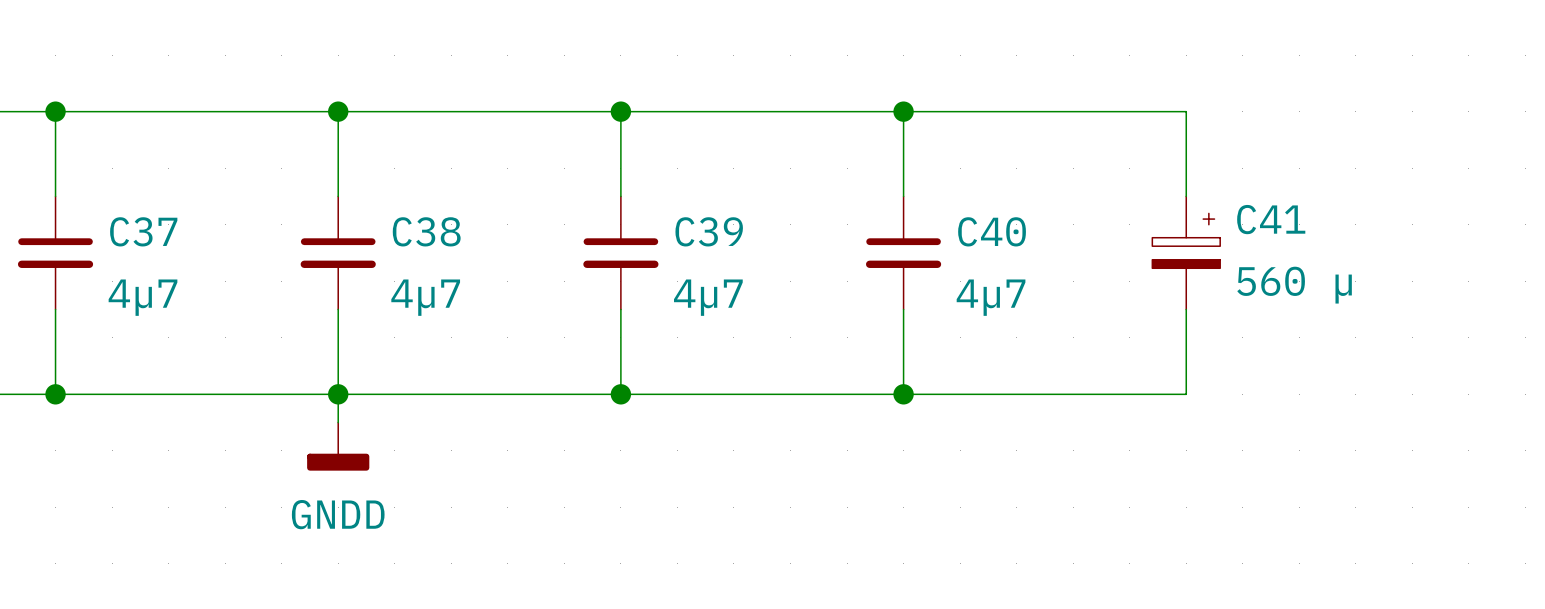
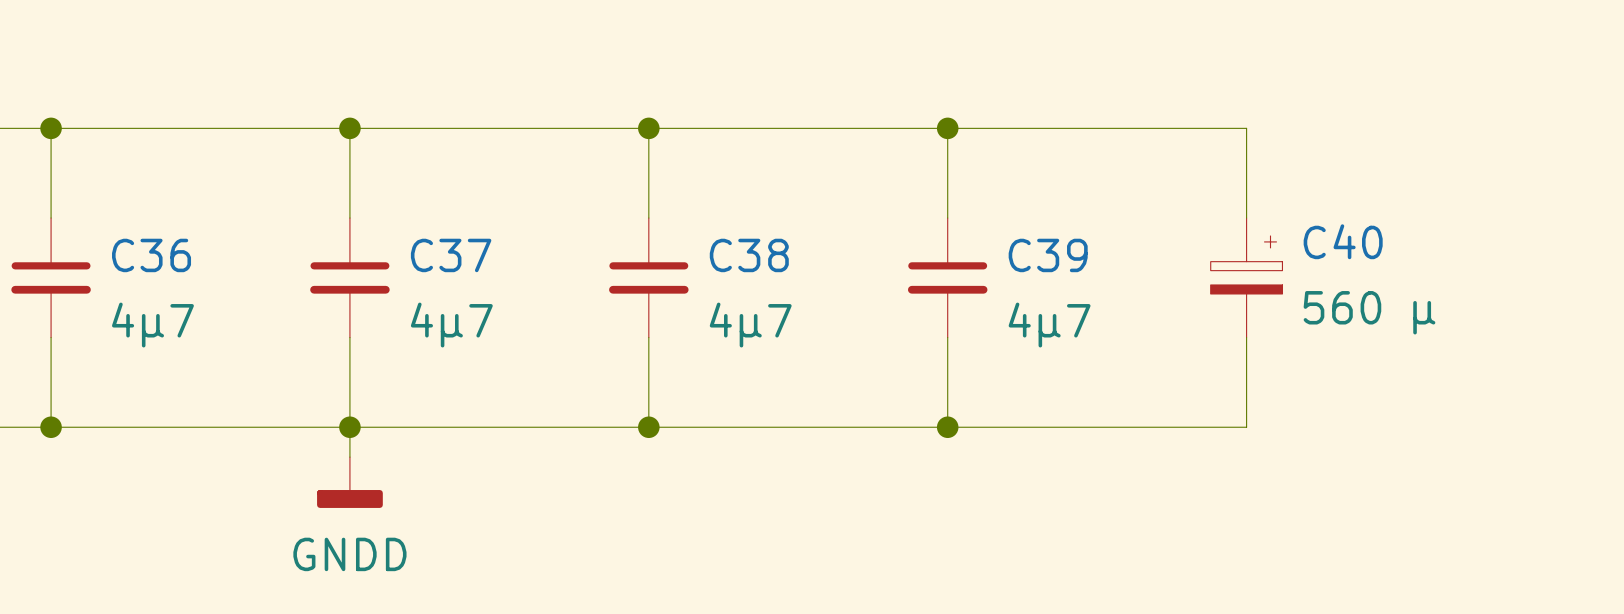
C41 name: C41 (1271, 219) -> C40 (1343, 241)
C37 name: C37 (143, 231) -> C36 (151, 255)
C38 name: C38 (426, 231) -> C37 (451, 255)
C39 name: C39 (709, 231) -> C38 (749, 255)
C40 name: C40 (992, 231) -> C39 (1048, 255)

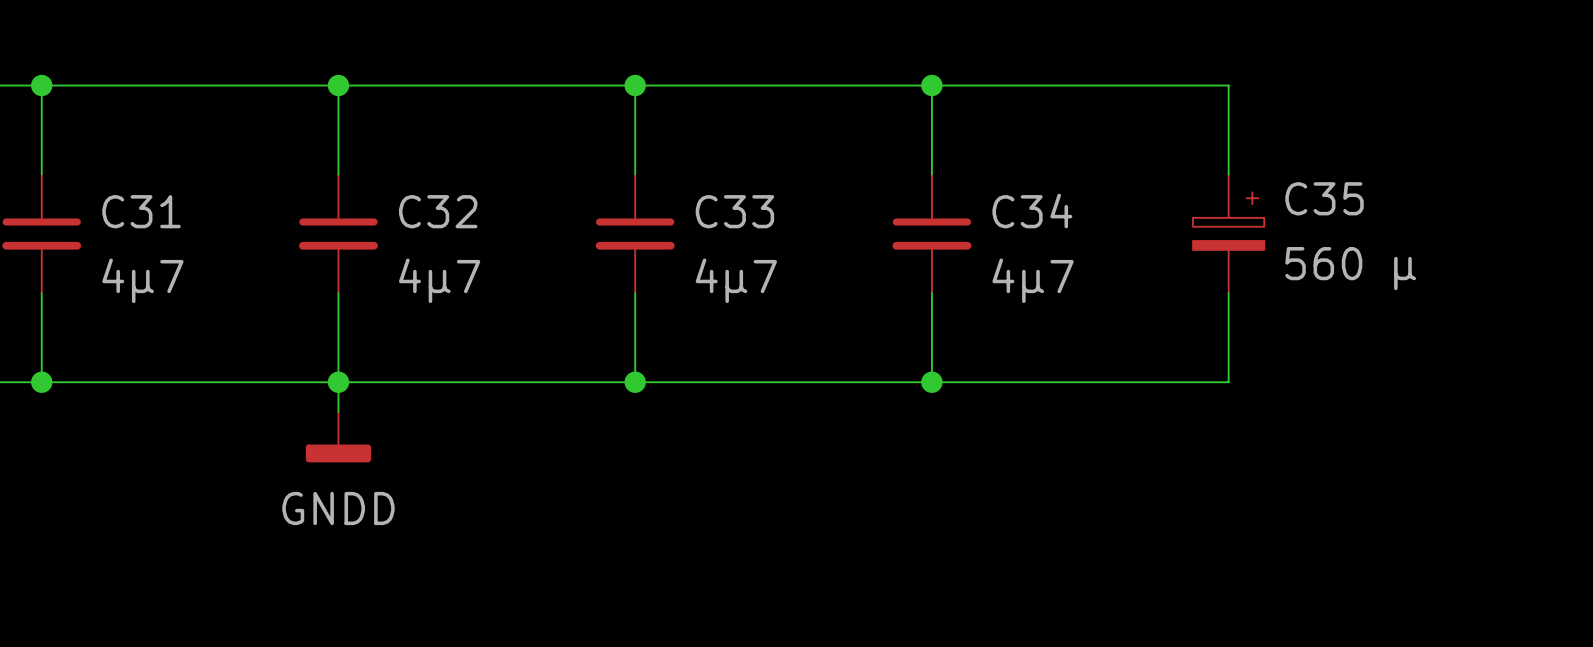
C40 name: C40 (1343, 241) -> C35 (1324, 198)
C36 name: C36 (151, 255) -> C31 (141, 211)
C37 name: C37 (451, 255) -> C32 (438, 211)
C38 name: C38 (749, 255) -> C33 (734, 211)
C39 name: C39 (1048, 255) -> C34 (1032, 210)

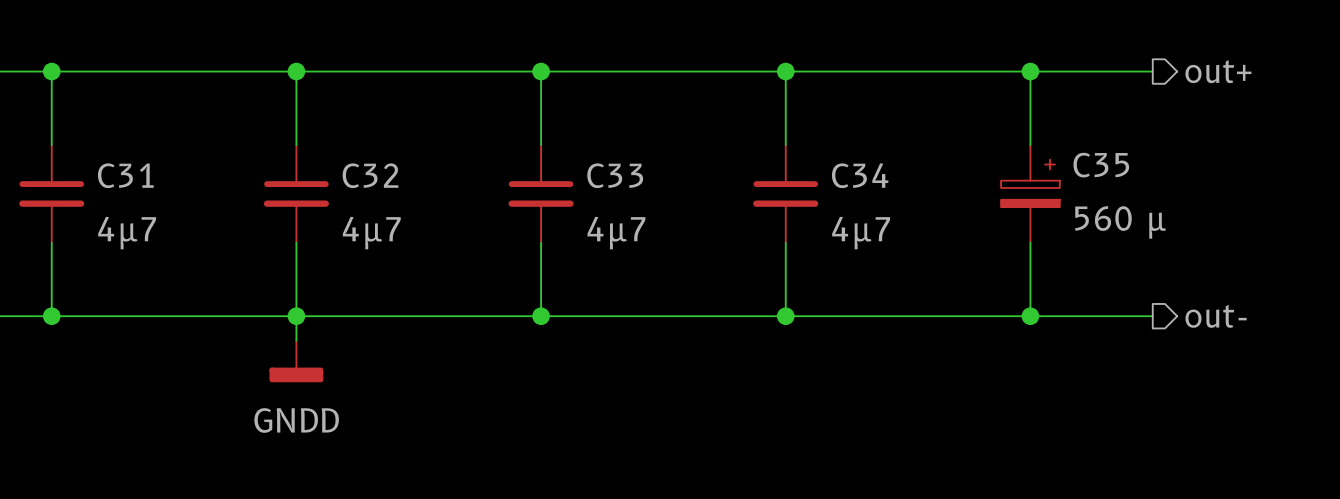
hierarchical label: none -> out+ (1218, 71)
wire: none -> (1030, 71) (1152, 71)
junction: none -> (1030, 71)
hierarchical label: none -> out- (1216, 316)
wire: none -> (1030, 316) (1152, 316)
junction: none -> (1030, 316)

